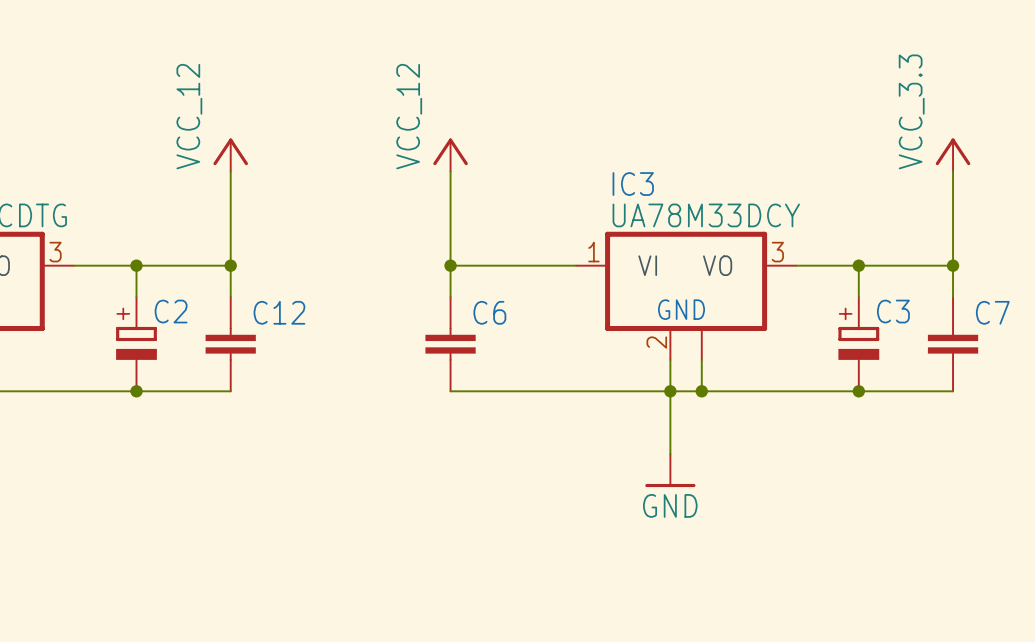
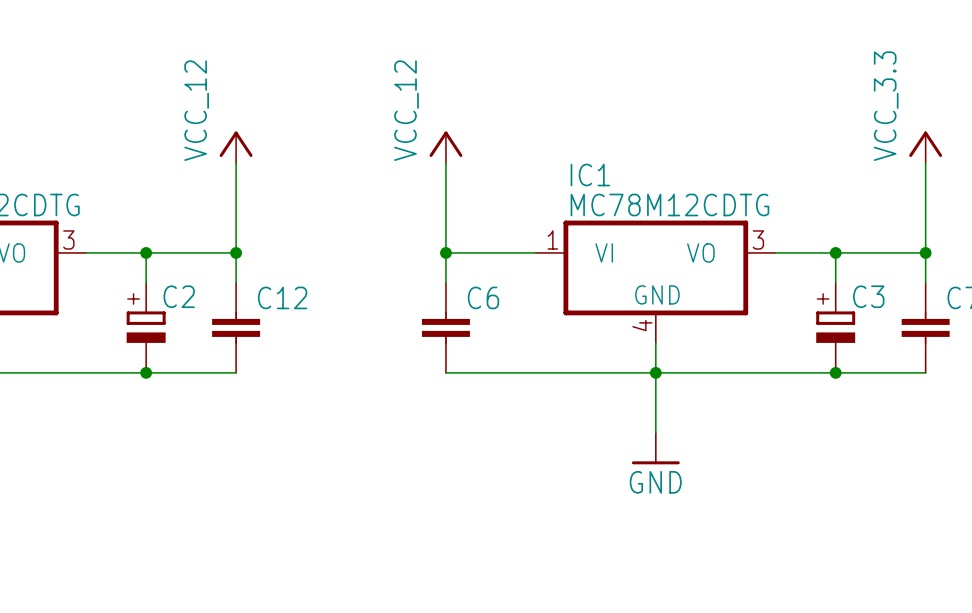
IC1: none -> MC78M12CDTG (655, 281)
IC3: UA78M33DCY (686, 295) -> none
wire: (701, 359) (701, 391) -> none
junction: (701, 391) -> none

